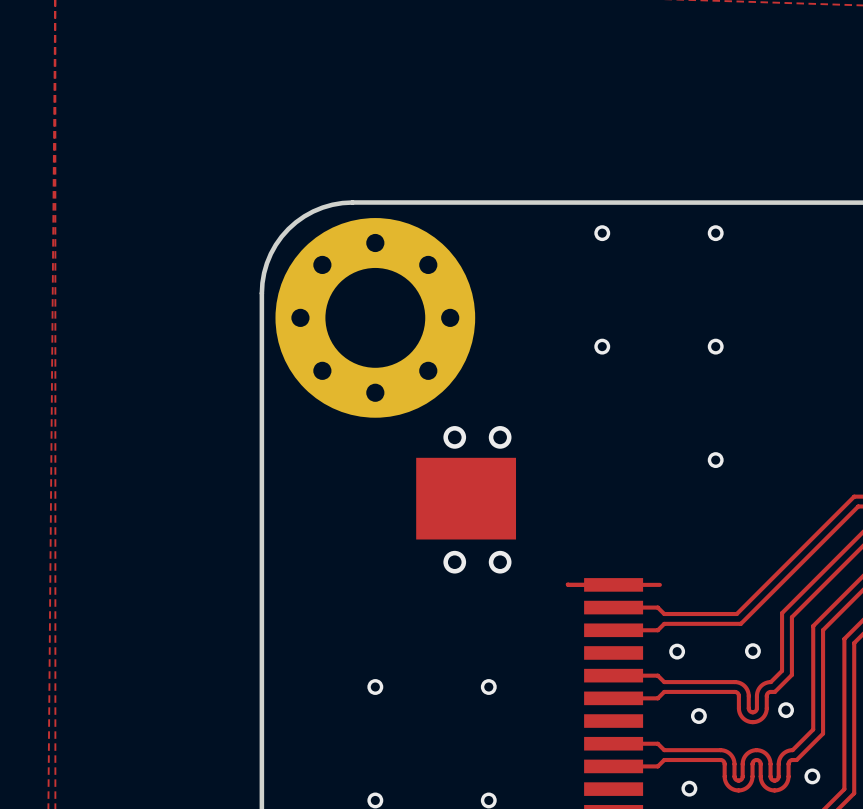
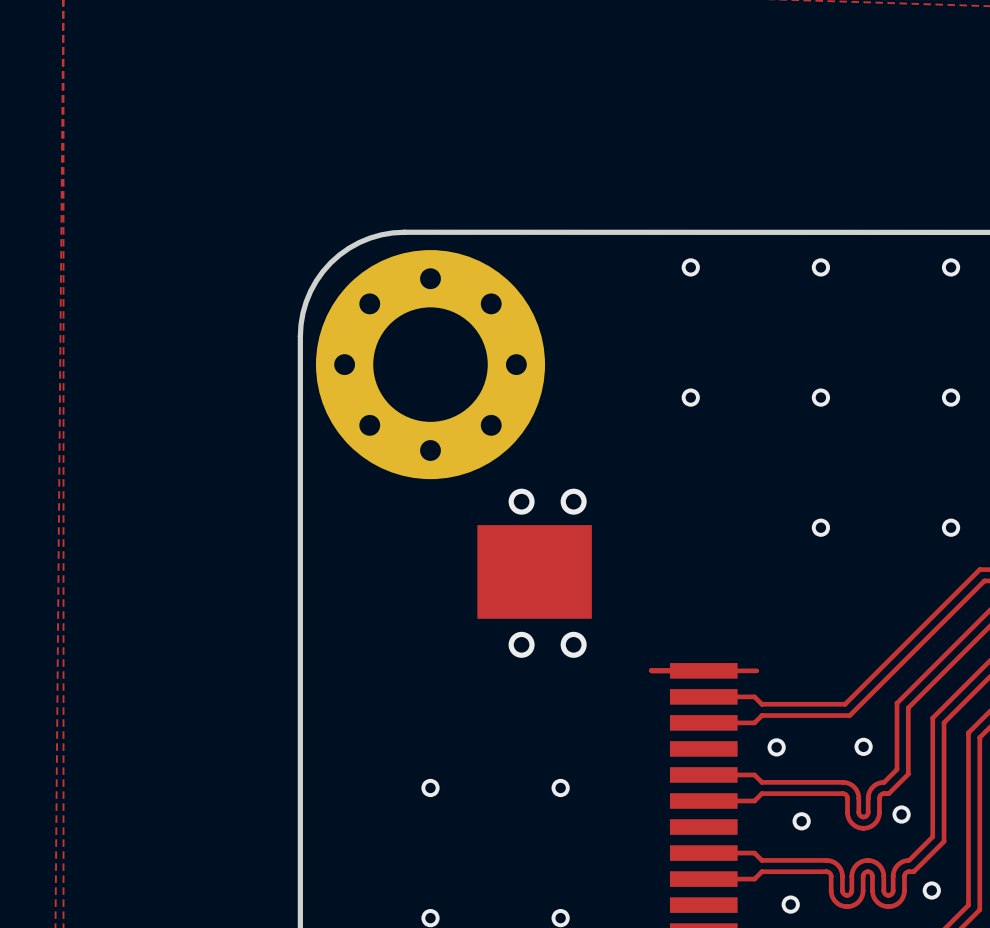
via: none -> (951, 267)
via: none -> (951, 397)
via: none -> (951, 527)

